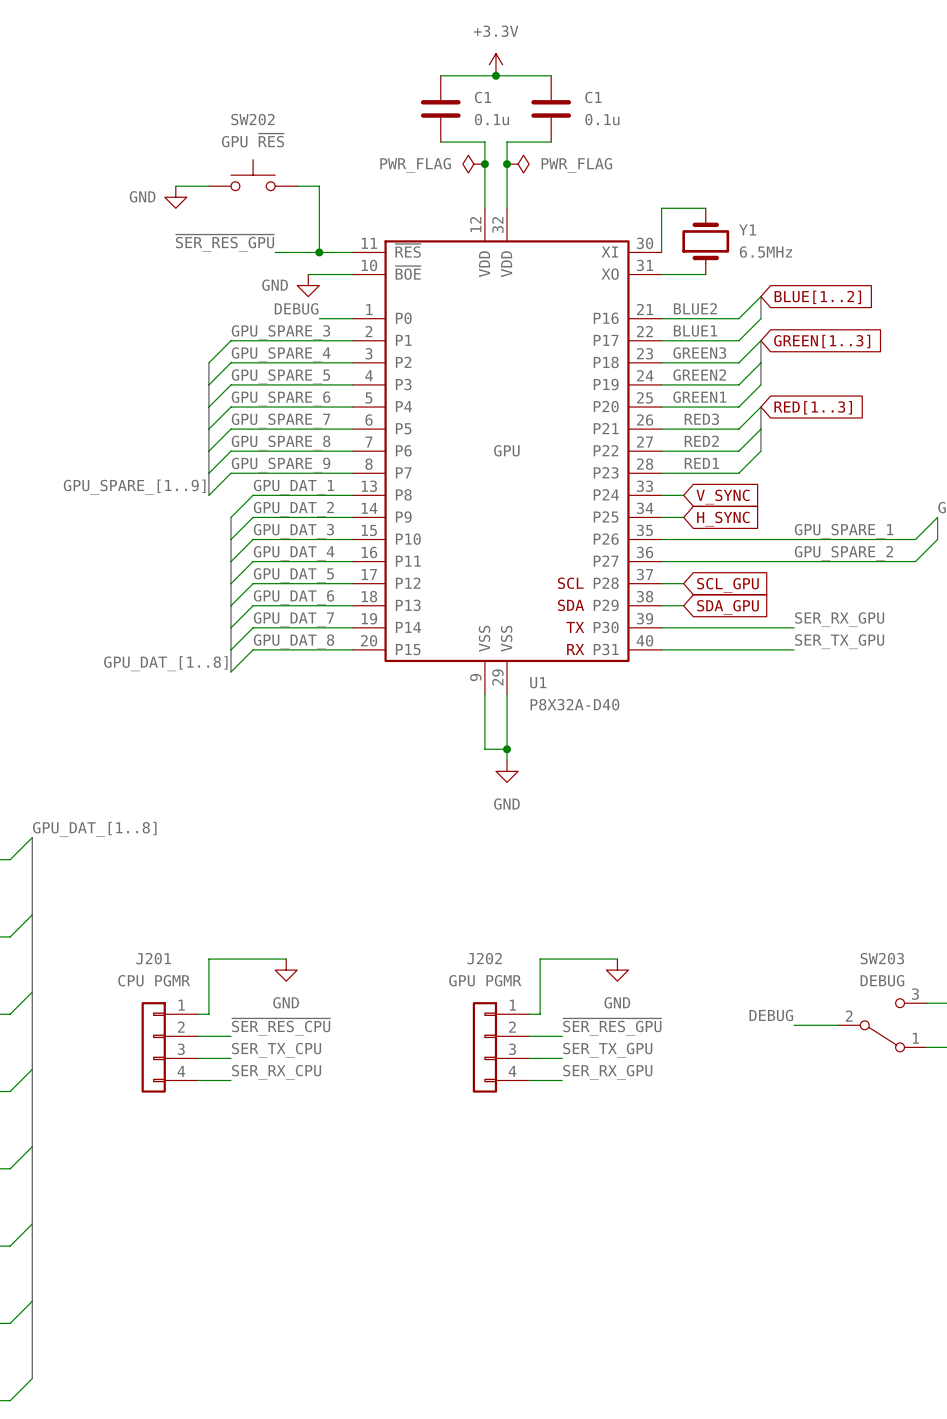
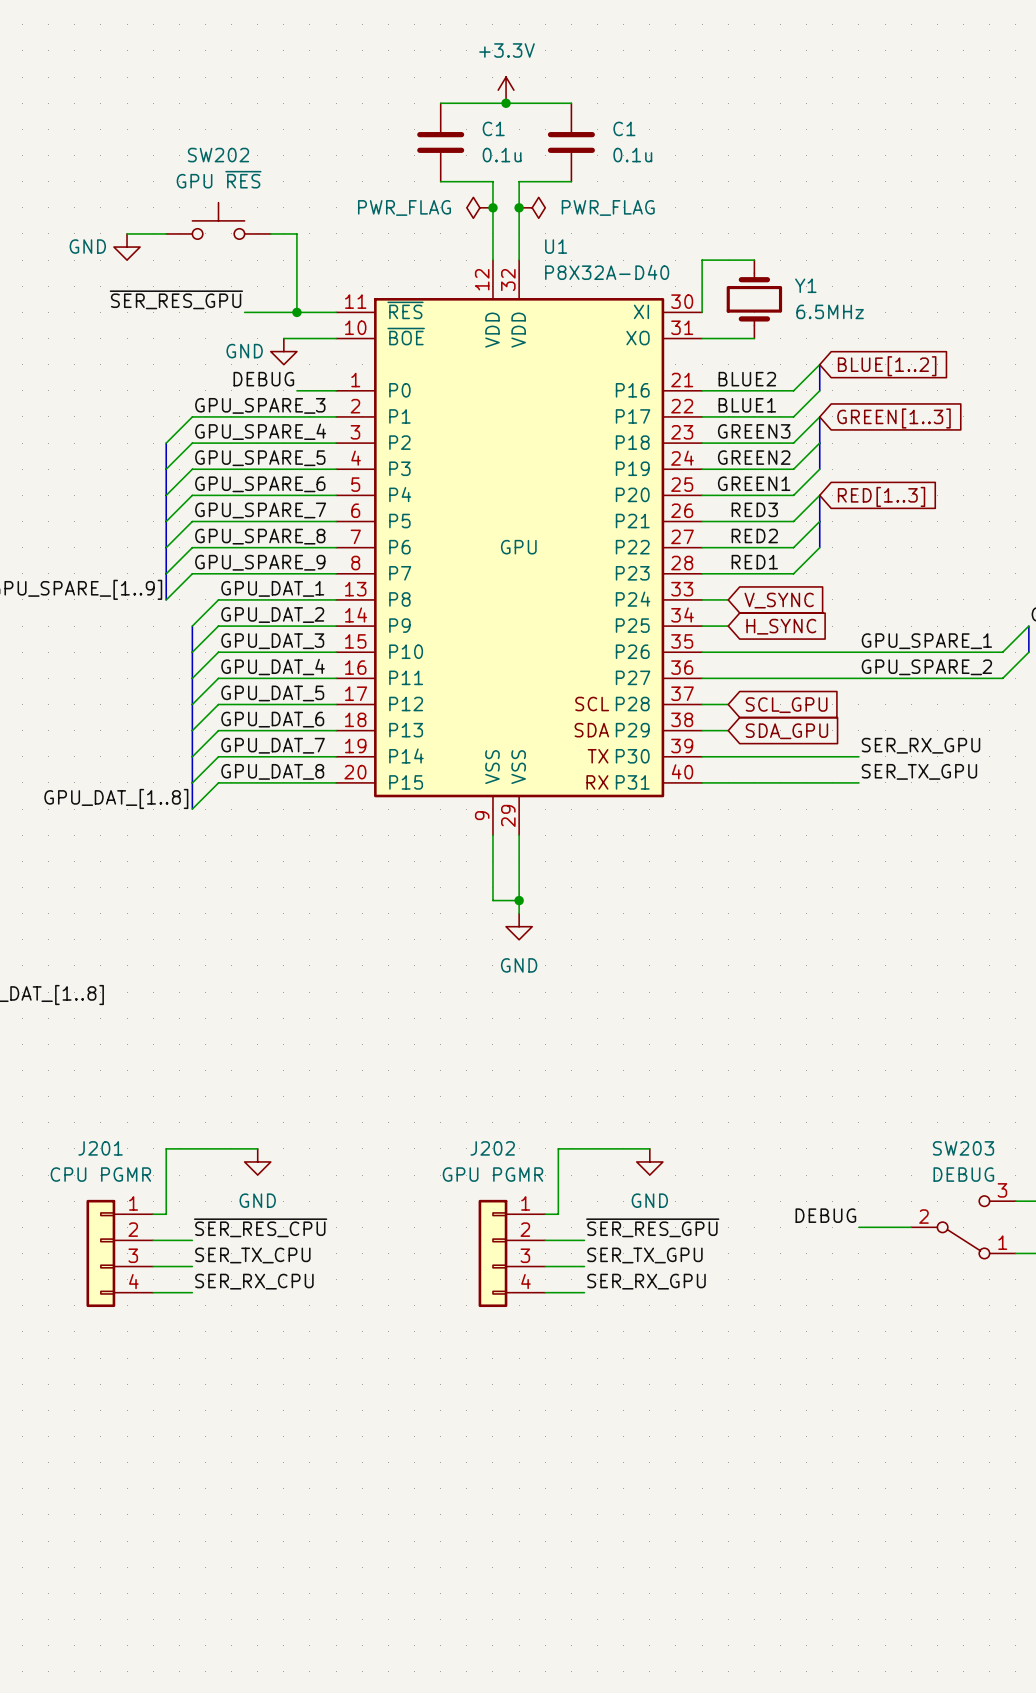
U1 name position: U1 (538, 682) -> U1 (556, 246)
U1 value position: P8X32A-D40 (574, 704) -> P8X32A-D40 (607, 272)

